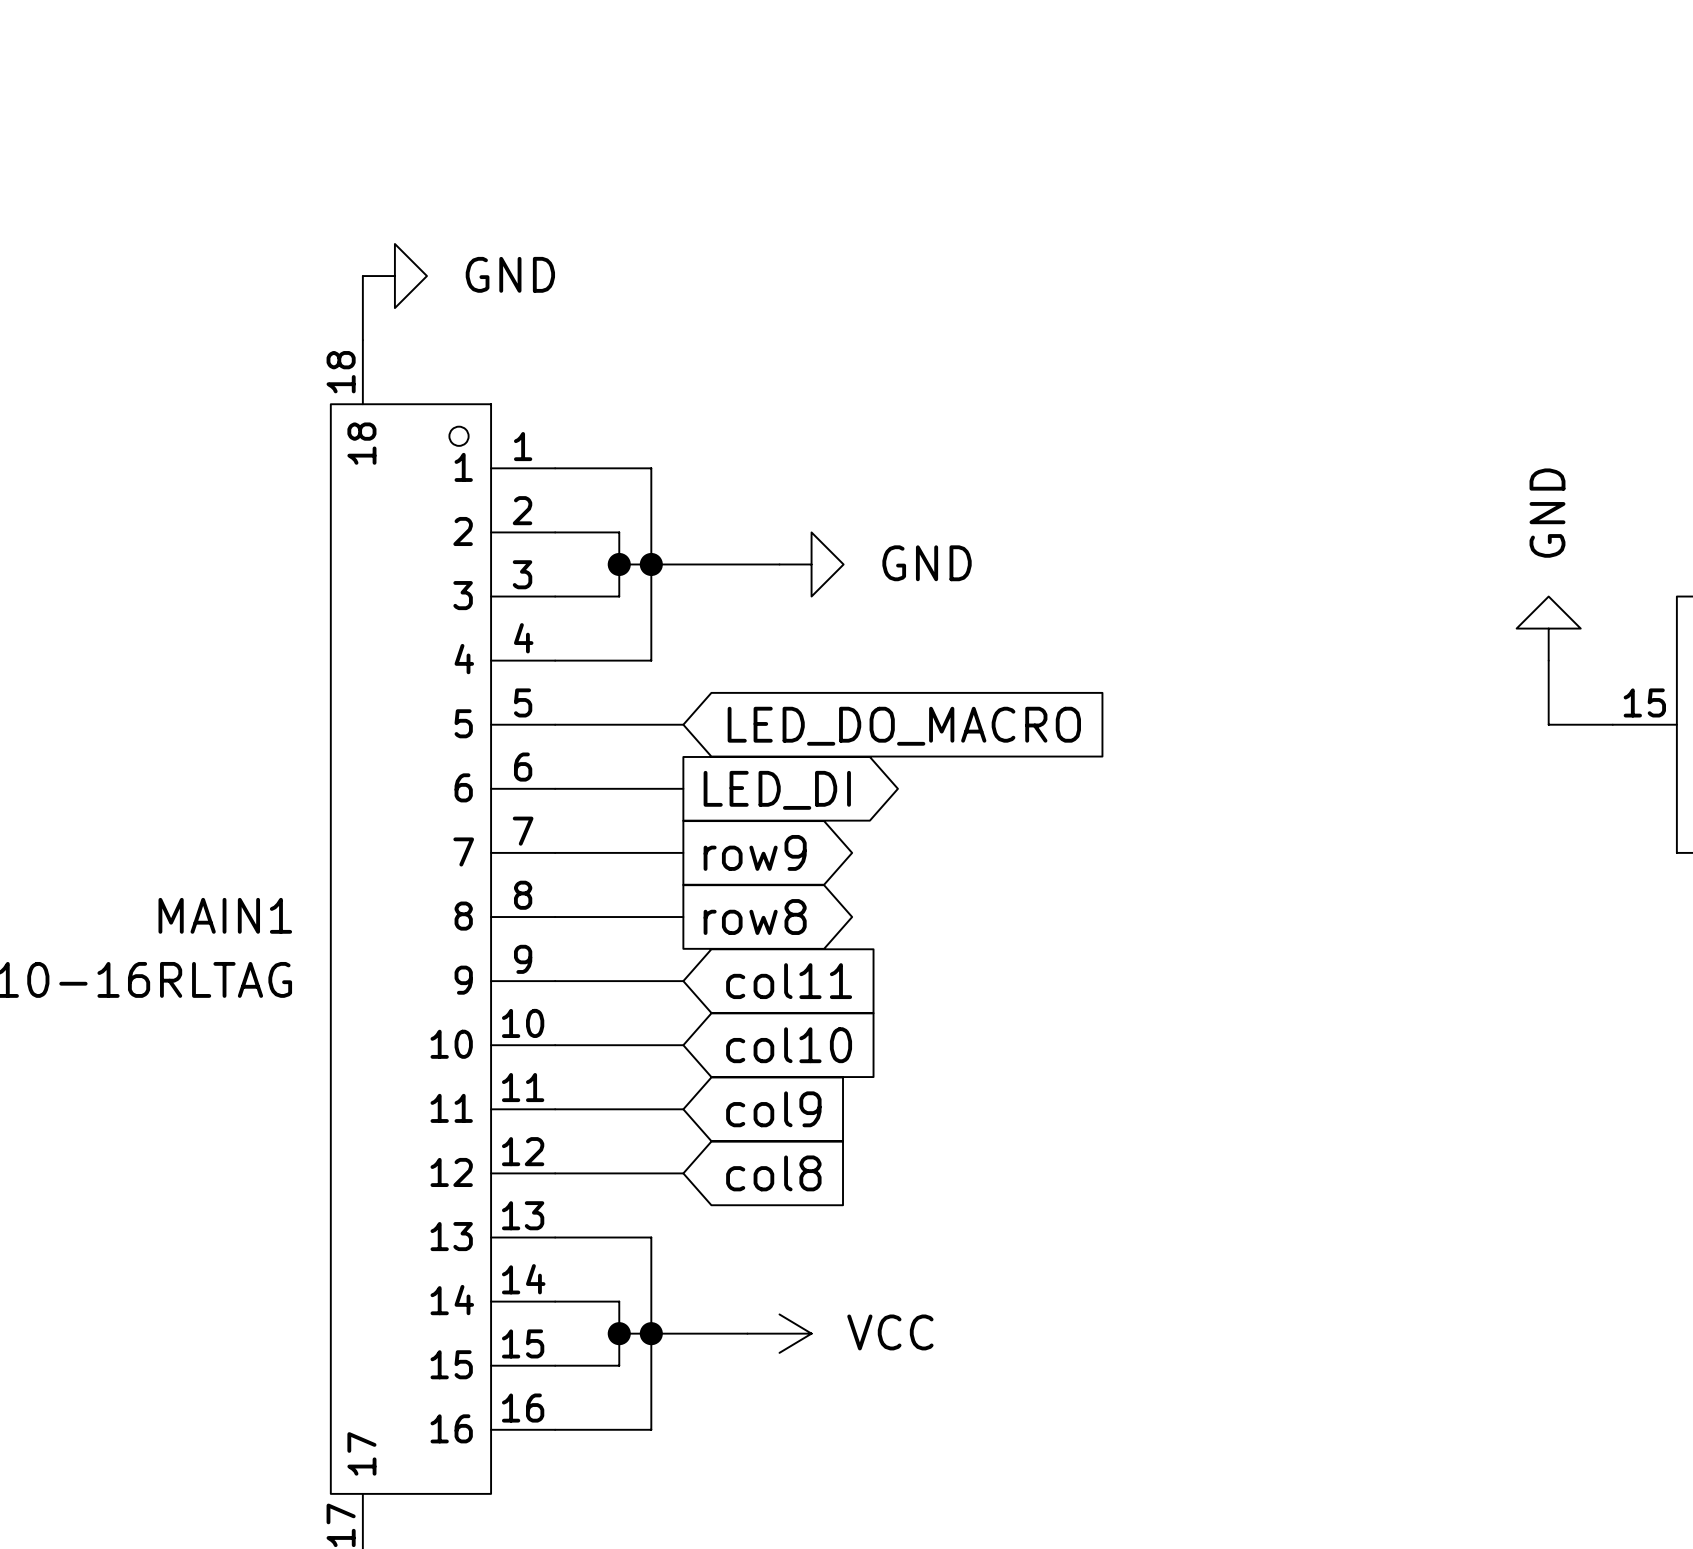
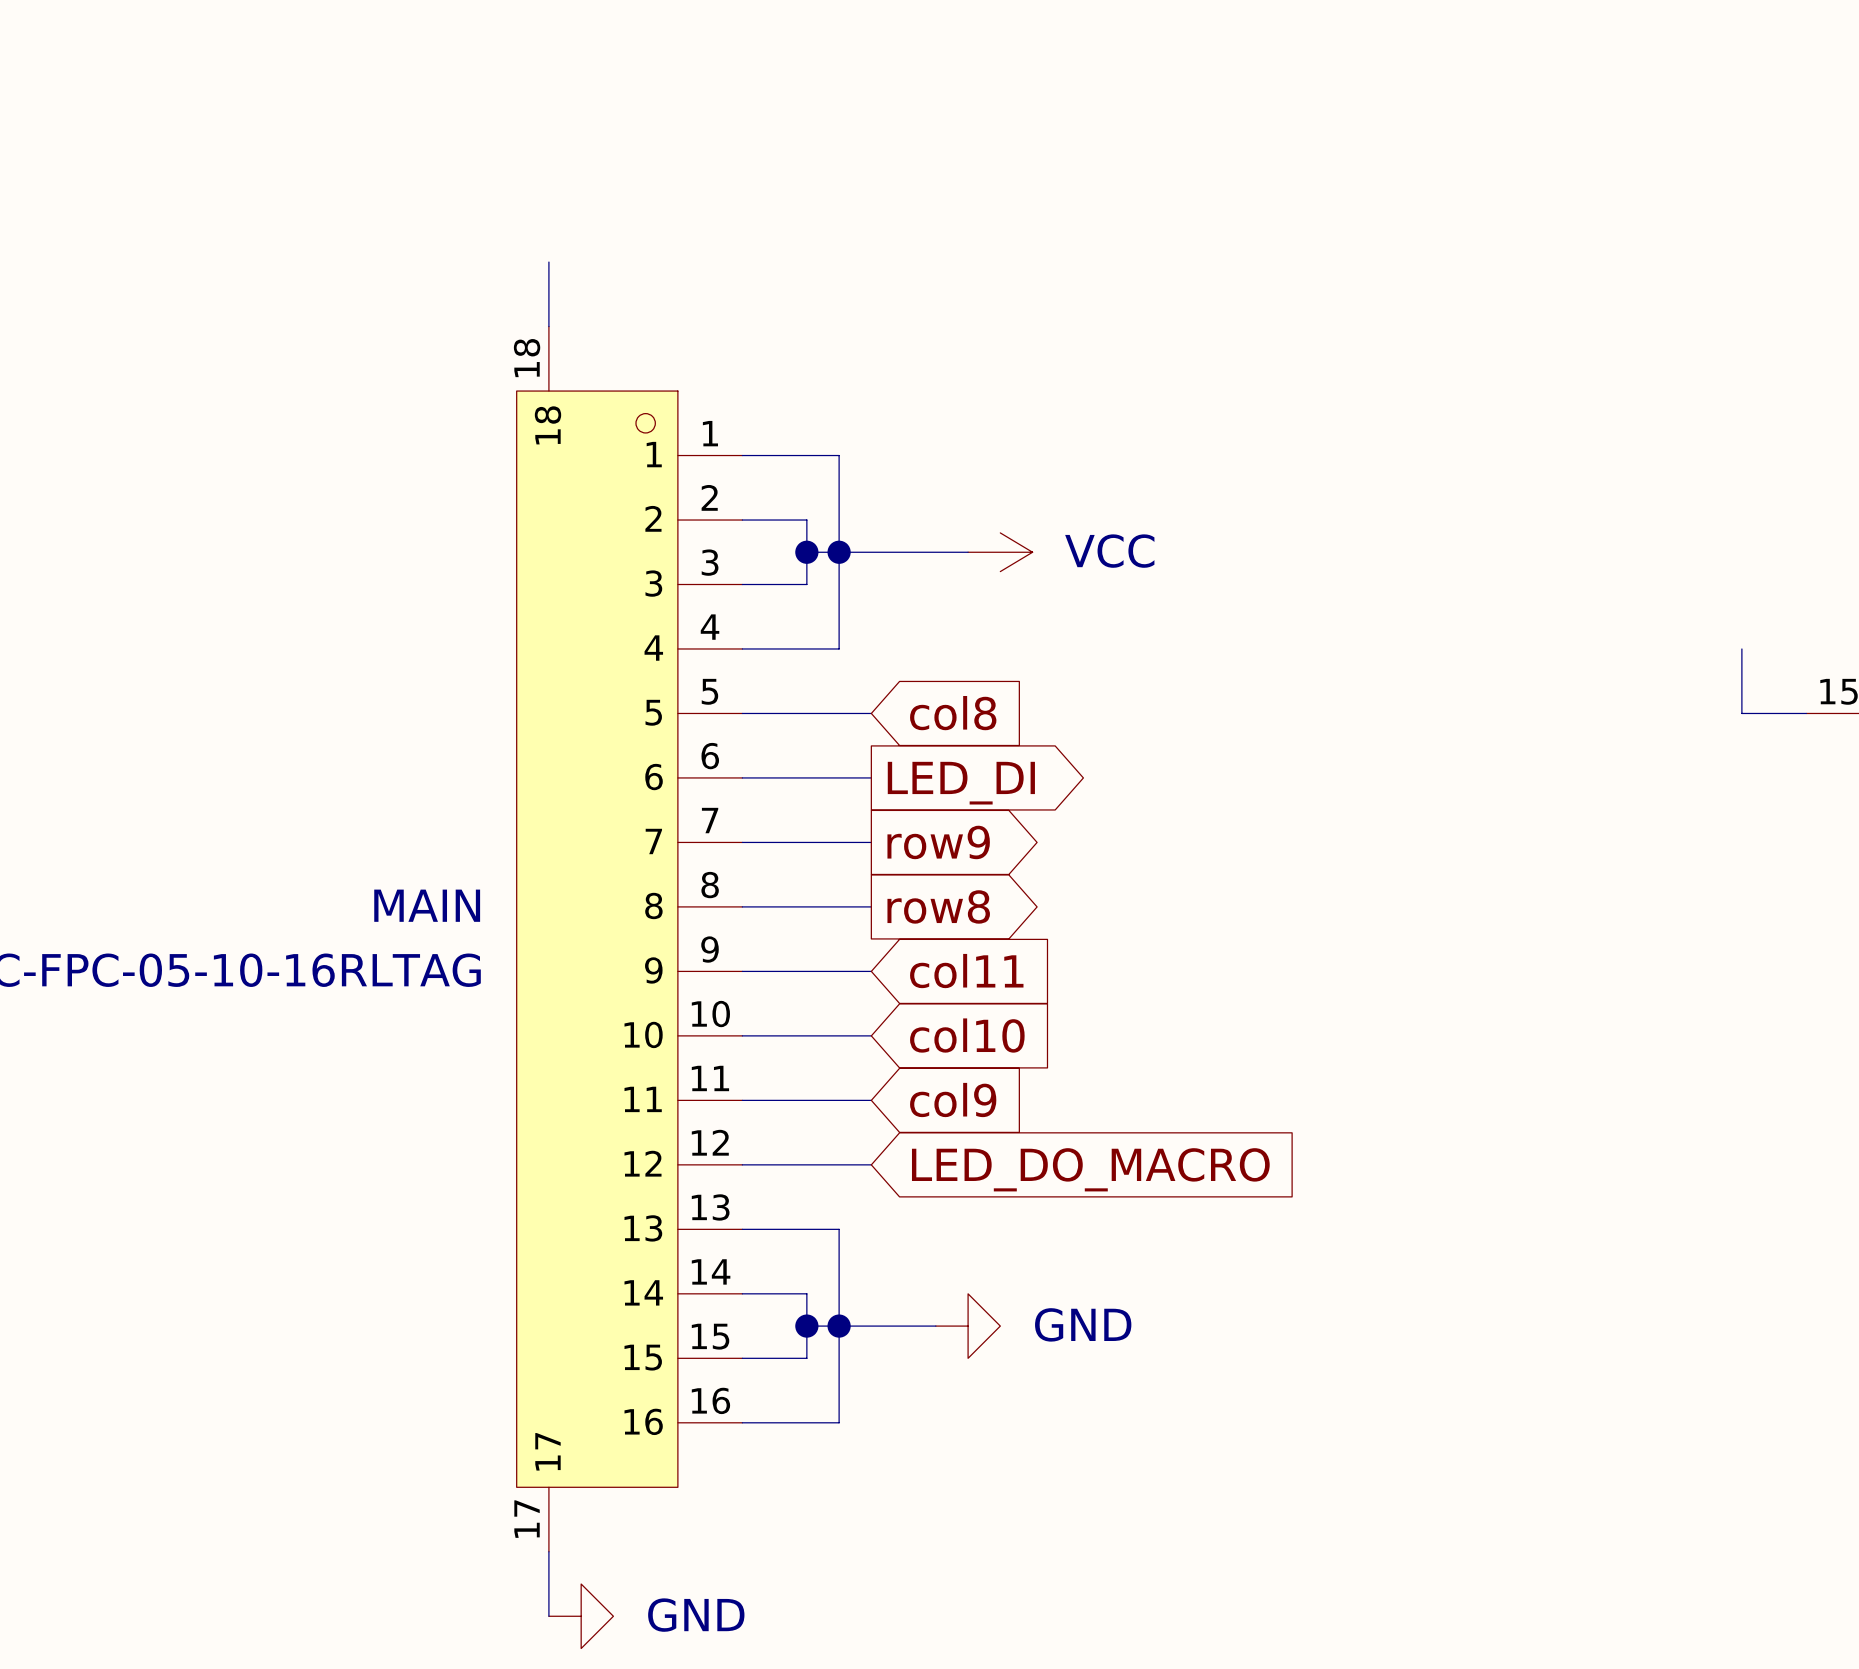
power symbol: GND (394, 276) -> none
power symbol: GND (811, 564) -> VCC (1000, 552)
power symbol: GND (1548, 628) -> none
global label: LED_DO_MACRO (904, 726) -> col8 (953, 713)
MAIN1 name: MAIN1 (225, 915) -> MAIN (427, 905)
global label: col8 (773, 1173) -> LED_DO_MACRO (1090, 1169)
power symbol: VCC (779, 1333) -> GND (968, 1326)

